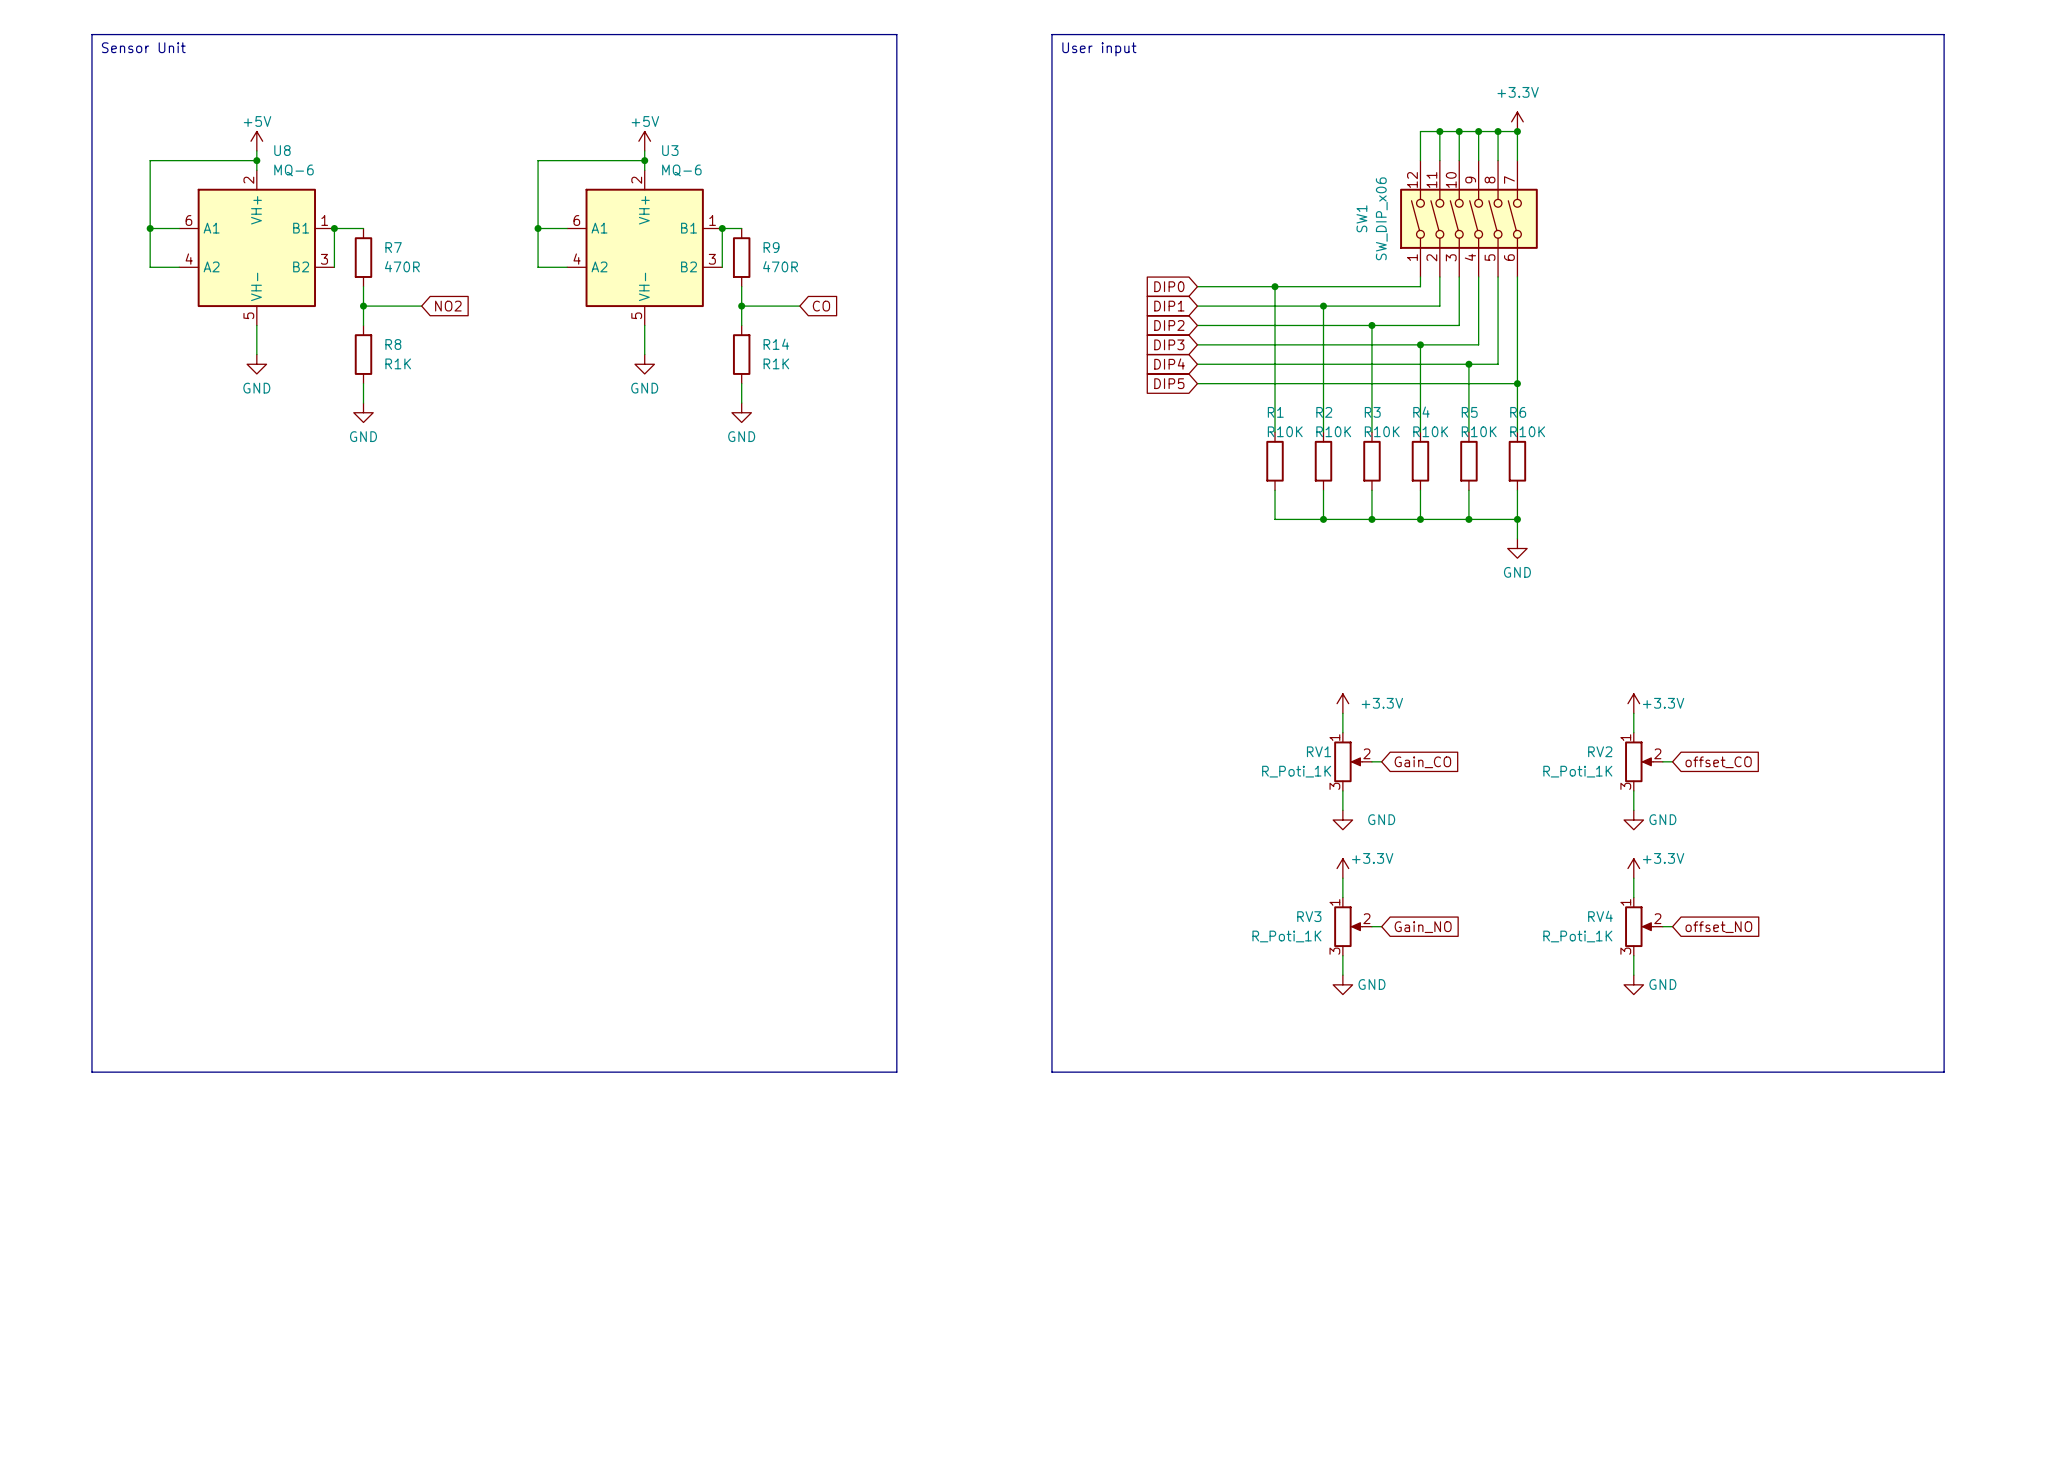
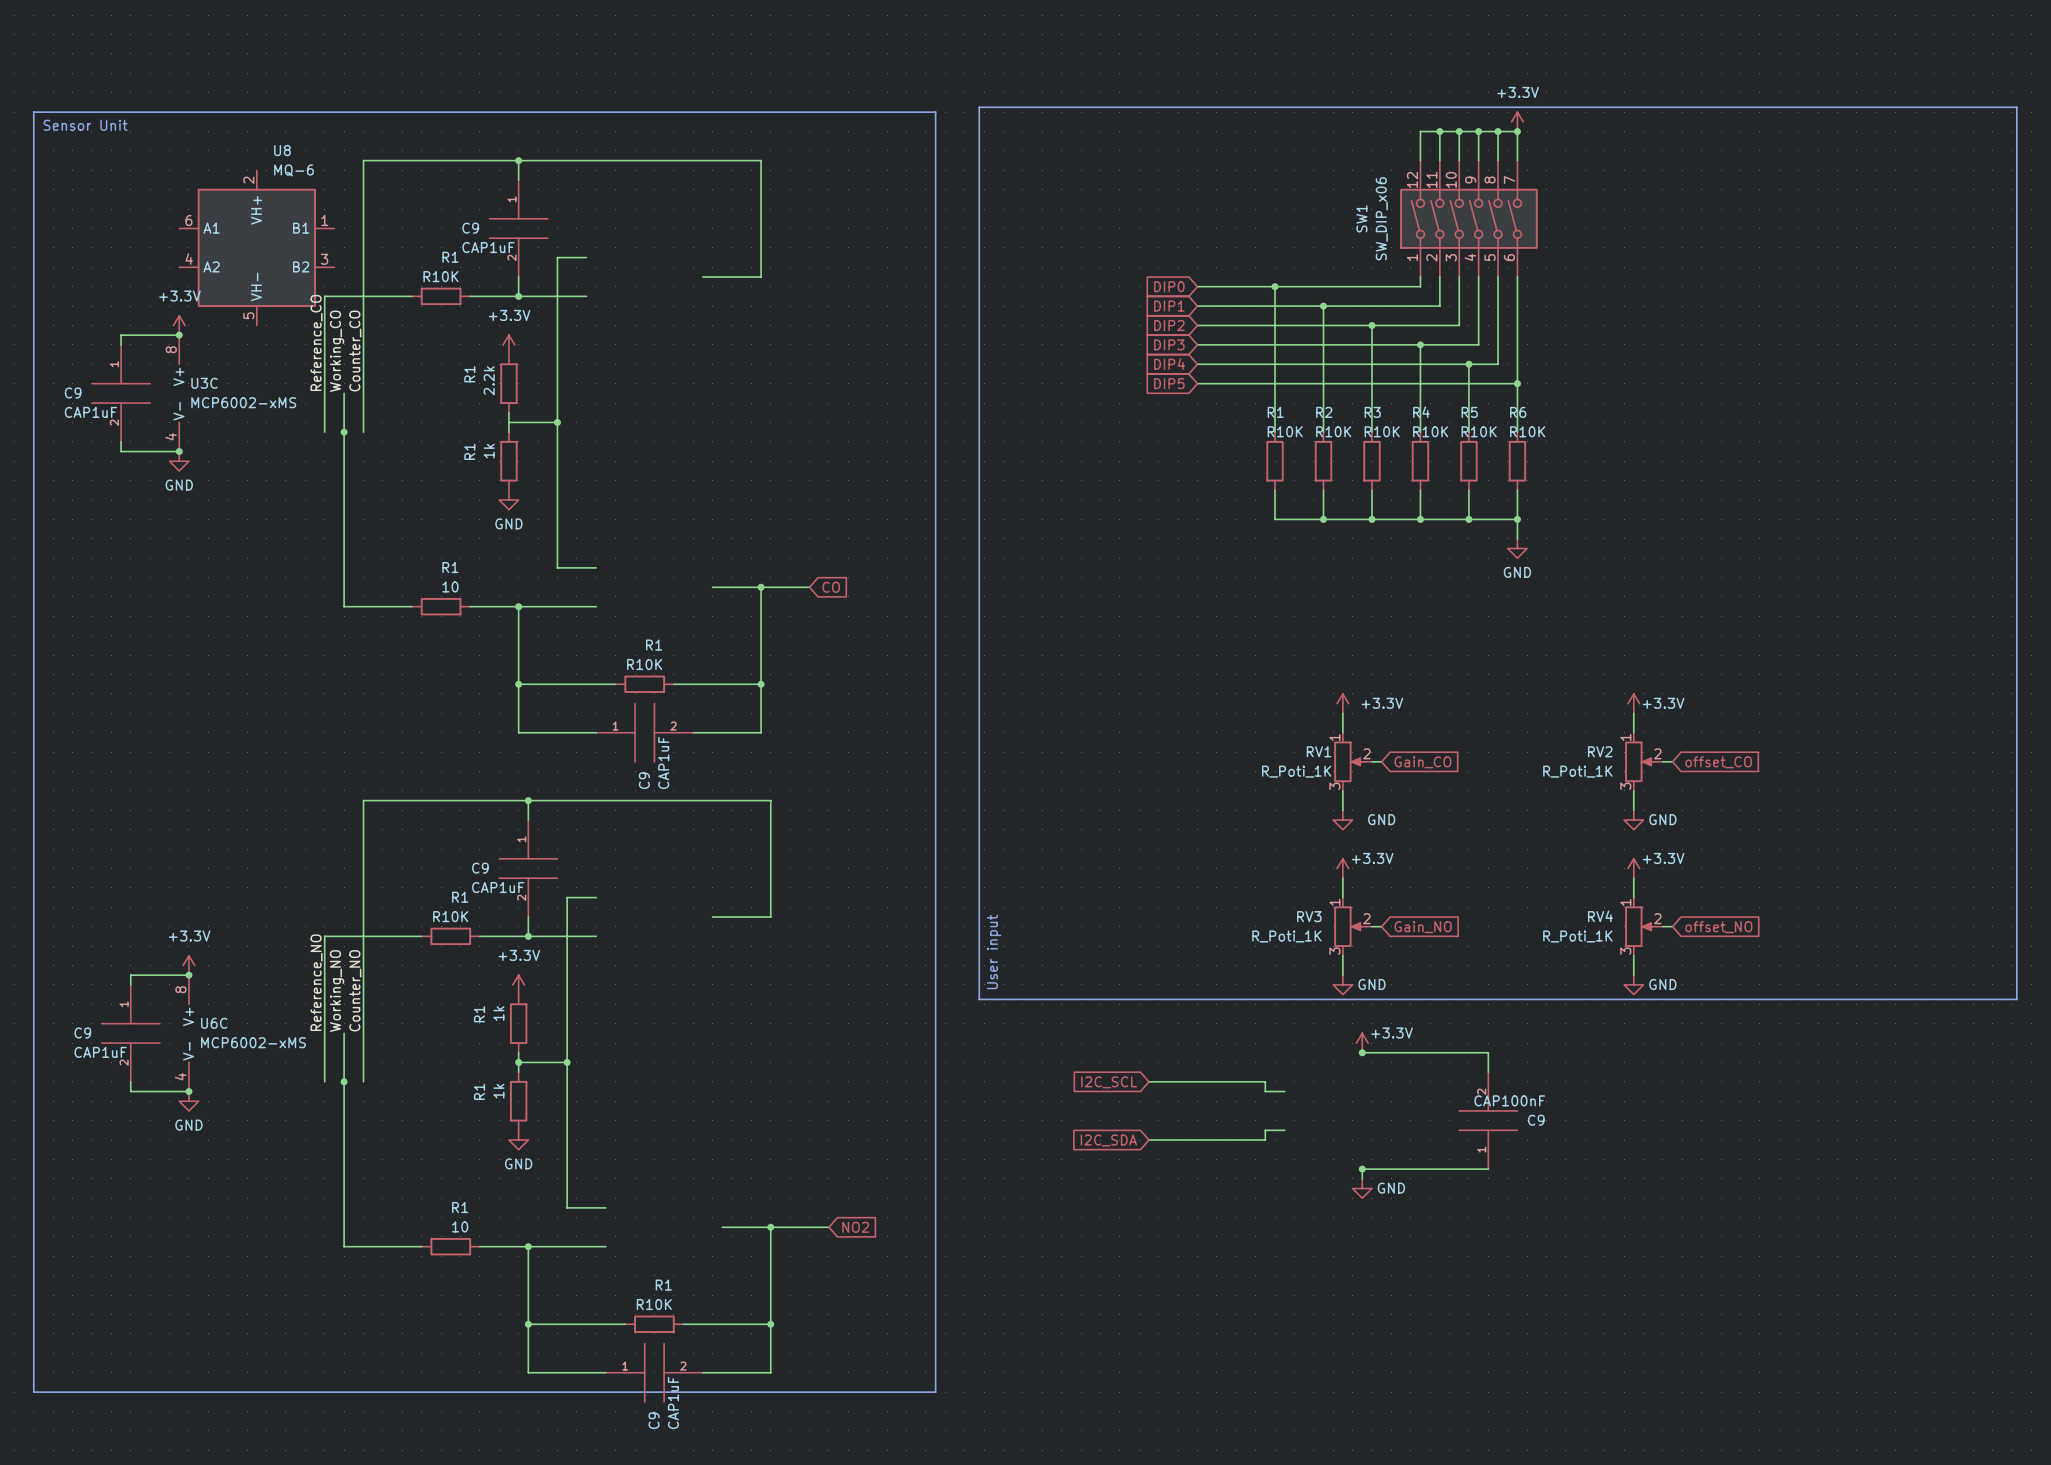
line: (91, 34) (896, 34) (896, 1072) (91, 1072) (91, 34) -> (33, 112) (33, 1392) (935, 1392) (935, 112) (33, 112)
line: (1051, 34) (1944, 34) (1944, 1072) (1051, 1072) (1051, 34) -> (979, 107) (979, 999) (2016, 999) (2016, 107) (979, 107)
text position: Sensor Unit (143, 47) -> Sensor Unit (85, 125)
text: User input (1099, 49) -> none
power symbol: +5V (256, 141) -> none
power symbol: +5V (644, 141) -> none
wire: (256, 150) (256, 170) -> none
wire: (644, 150) (644, 170) -> (518, 160) (518, 180)
wire: (256, 160) (150, 160) (150, 267) (179, 267) -> none
junction: (256, 160) -> none
junction: none -> (518, 160)
wire: (538, 160) (538, 267) (567, 267) -> (538, 160) (363, 160) (363, 286)
wire: none -> (644, 160) (761, 160) (761, 276) (702, 276)
junction: (644, 160) -> none
wire: (150, 228) (179, 228) -> none
junction: (150, 228) -> none
junction: (334, 228) -> none
wire: (363, 228) (334, 228) (334, 267) -> none
C9: none -> CAP1uF (518, 228)
wire: (538, 228) (567, 228) -> none
junction: (538, 228) -> none
junction: (722, 228) -> none
wire: (741, 228) (722, 228) (722, 267) -> none
U3: MQ-6 (644, 247) -> none
R7: 470R (363, 257) -> none
wire: none -> (586, 257) (557, 257) (557, 567) (596, 567)
R9: 470R (741, 257) -> none
wire: none -> (518, 276) (518, 296)
wire: (741, 286) (741, 325) -> none
wire: none -> (411, 296) (324, 296) (324, 432)
R1: none -> R10K (441, 296)
wire: none -> (470, 296) (586, 296)
junction: none -> (518, 296)
wire: (363, 306) (421, 306) -> none
junction: (363, 306) -> none
global label: NO2 (448, 306) -> none
wire: (741, 306) (799, 306) -> none
junction: (741, 306) -> none
global label: CO (821, 306) -> none
power symbol: none -> +3.3V (179, 325)
wire: (256, 325) (256, 354) -> (363, 403) (363, 432)
wire: none -> (363, 325) (363, 383)
wire: (644, 325) (644, 354) -> none
wire: none -> (179, 335) (121, 335) (121, 344)
junction: none -> (179, 335)
label: none -> Reference_CO (316, 342)
power symbol: none -> +3.3V (508, 344)
label: none -> Working_CO (337, 351)
label: none -> Counter_CO (355, 351)
R8: R1K (363, 354) -> none
R14: R1K (741, 354) -> none
power symbol: GND (256, 364) -> none
power symbol: GND (644, 364) -> none
R1: none -> 2.2k (508, 383)
wire: (741, 383) (741, 403) -> none
C9: none -> CAP1uF (121, 393)
U3C: none -> MCP6002-xMS (179, 393)
wire: none -> (344, 393) (344, 606) (411, 606)
power symbol: GND (363, 412) -> none
wire: none -> (508, 412) (508, 432)
power symbol: GND (741, 412) -> none
wire: none -> (508, 422) (557, 422)
junction: none -> (557, 422)
junction: none -> (344, 432)
wire: none -> (121, 441) (121, 451) (179, 451)
junction: none -> (179, 451)
power symbol: none -> GND (179, 461)
R1: none -> 1k (508, 461)
power symbol: none -> GND (508, 500)
wire: none -> (712, 587) (809, 587)
wire: none -> (761, 587) (761, 732) (693, 732)
junction: none -> (761, 587)
global label: none -> CO (831, 587)
R1: none -> 10 (441, 606)
wire: none -> (470, 606) (596, 606)
wire: none -> (518, 606) (518, 732) (596, 732)
junction: none -> (518, 606)
wire: none -> (518, 684) (615, 684)
junction: none -> (518, 684)
R1: none -> R10K (644, 684)
wire: none -> (673, 684) (761, 684)
junction: none -> (761, 684)
C9: none -> CAP1uF (644, 732)
wire: none -> (528, 800) (528, 820)
junction: none -> (528, 800)
C9: none -> CAP1uF (528, 868)
wire: none -> (596, 897) (567, 897) (567, 1207) (605, 1207)
wire: none -> (528, 916) (528, 936)
wire: none -> (712, 916) (770, 916) (770, 800) (363, 800) (363, 1081)
wire: none -> (421, 936) (324, 936) (324, 1081)
R1: none -> R10K (450, 936)
wire: none -> (479, 936) (596, 936)
junction: none -> (528, 936)
text: none -> User input (994, 952)
power symbol: none -> +3.3V (188, 965)
wire: none -> (188, 975) (130, 975) (130, 984)
junction: none -> (188, 975)
label: none -> Reference_NO (316, 982)
power symbol: none -> +3.3V (518, 984)
label: none -> Counter_NO (355, 990)
label: none -> Working_NO (337, 991)
R1: none -> 1k (518, 1023)
C9: none -> CAP1uF (130, 1033)
U6C: none -> MCP6002-xMS (188, 1033)
wire: none -> (344, 1033) (344, 1246) (421, 1246)
power symbol: none -> +3.3V (1362, 1043)
wire: none -> (518, 1052) (518, 1072)
wire: none -> (1362, 1052) (1488, 1052) (1488, 1072)
junction: none -> (1362, 1052)
wire: none -> (518, 1062) (567, 1062)
junction: none -> (518, 1062)
junction: none -> (567, 1062)
wire: none -> (130, 1081) (130, 1091) (188, 1091)
junction: none -> (344, 1081)
wire: none -> (1148, 1081) (1265, 1081) (1265, 1091) (1284, 1091)
global label: none -> I2C_SCL (1109, 1082)
junction: none -> (188, 1091)
power symbol: none -> GND (188, 1101)
R1: none -> 1k (518, 1101)
C9: none -> CAP100nF (1488, 1120)
wire: none -> (1284, 1130) (1265, 1130) (1265, 1140) (1148, 1140)
power symbol: none -> GND (518, 1140)
global label: none -> I2C_SDA (1108, 1140)
junction: none -> (1362, 1169)
wire: none -> (1488, 1169) (1362, 1169) (1362, 1178)
power symbol: none -> GND (1362, 1188)
wire: none -> (722, 1227) (828, 1227)
wire: none -> (770, 1227) (770, 1372) (702, 1372)
junction: none -> (770, 1227)
global label: none -> NO2 (855, 1227)
R1: none -> 10 (450, 1246)
wire: none -> (479, 1246) (605, 1246)
wire: none -> (528, 1246) (528, 1372) (605, 1372)
junction: none -> (528, 1246)
wire: none -> (528, 1324) (625, 1324)
junction: none -> (528, 1324)
R1: none -> R10K (654, 1324)
wire: none -> (683, 1324) (770, 1324)
junction: none -> (770, 1324)
C9: none -> CAP1uF (654, 1372)

